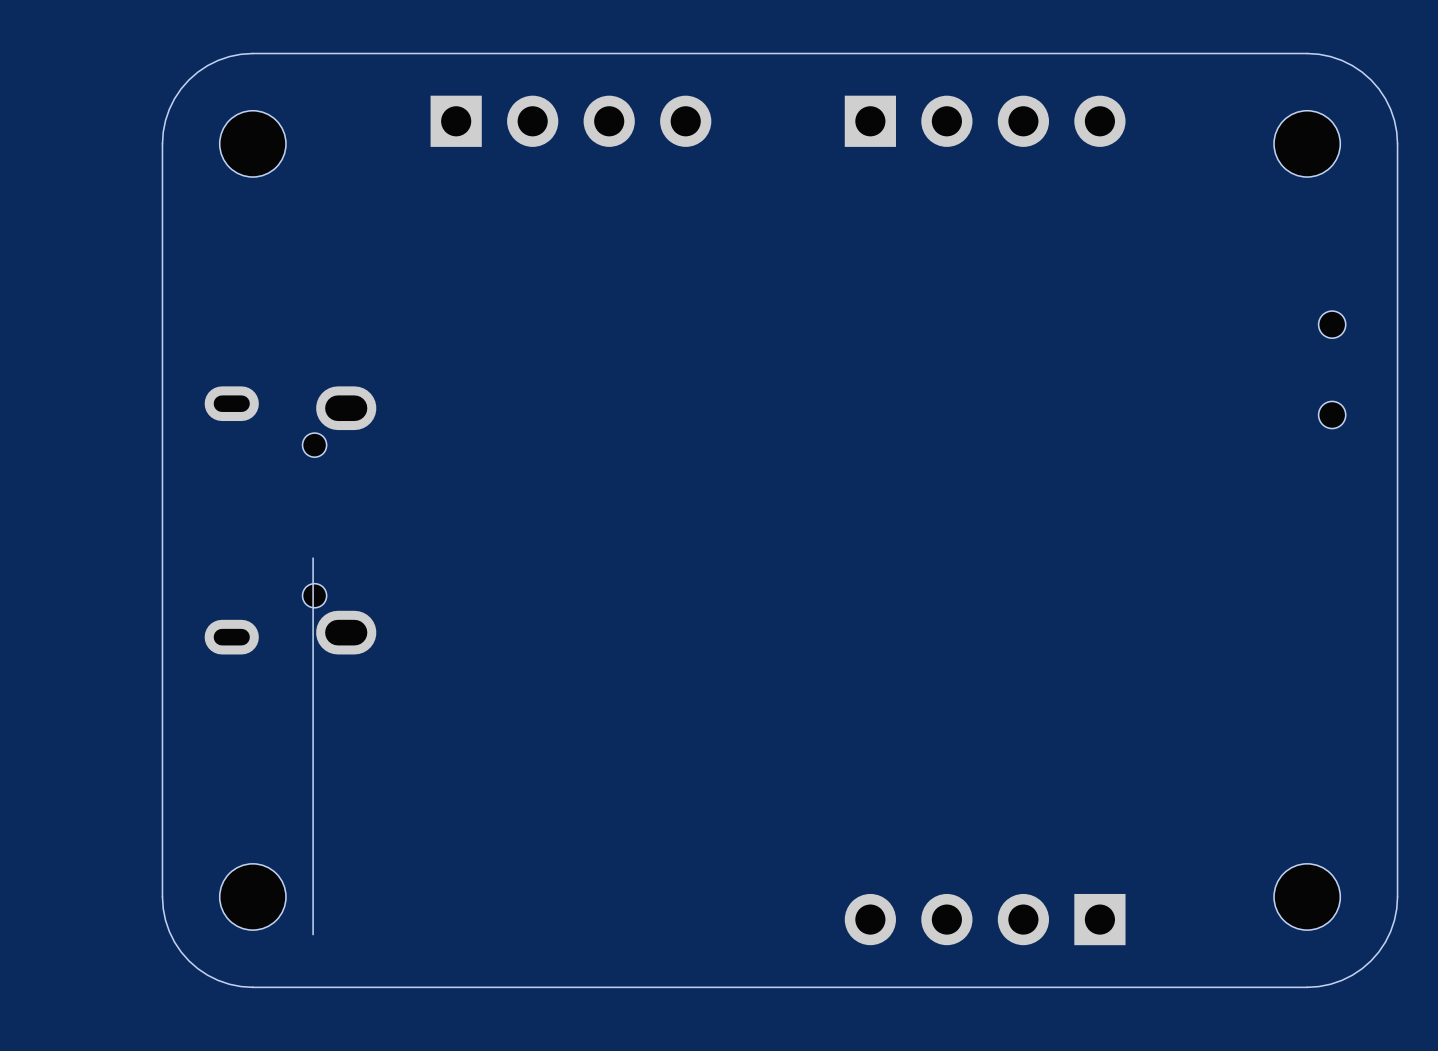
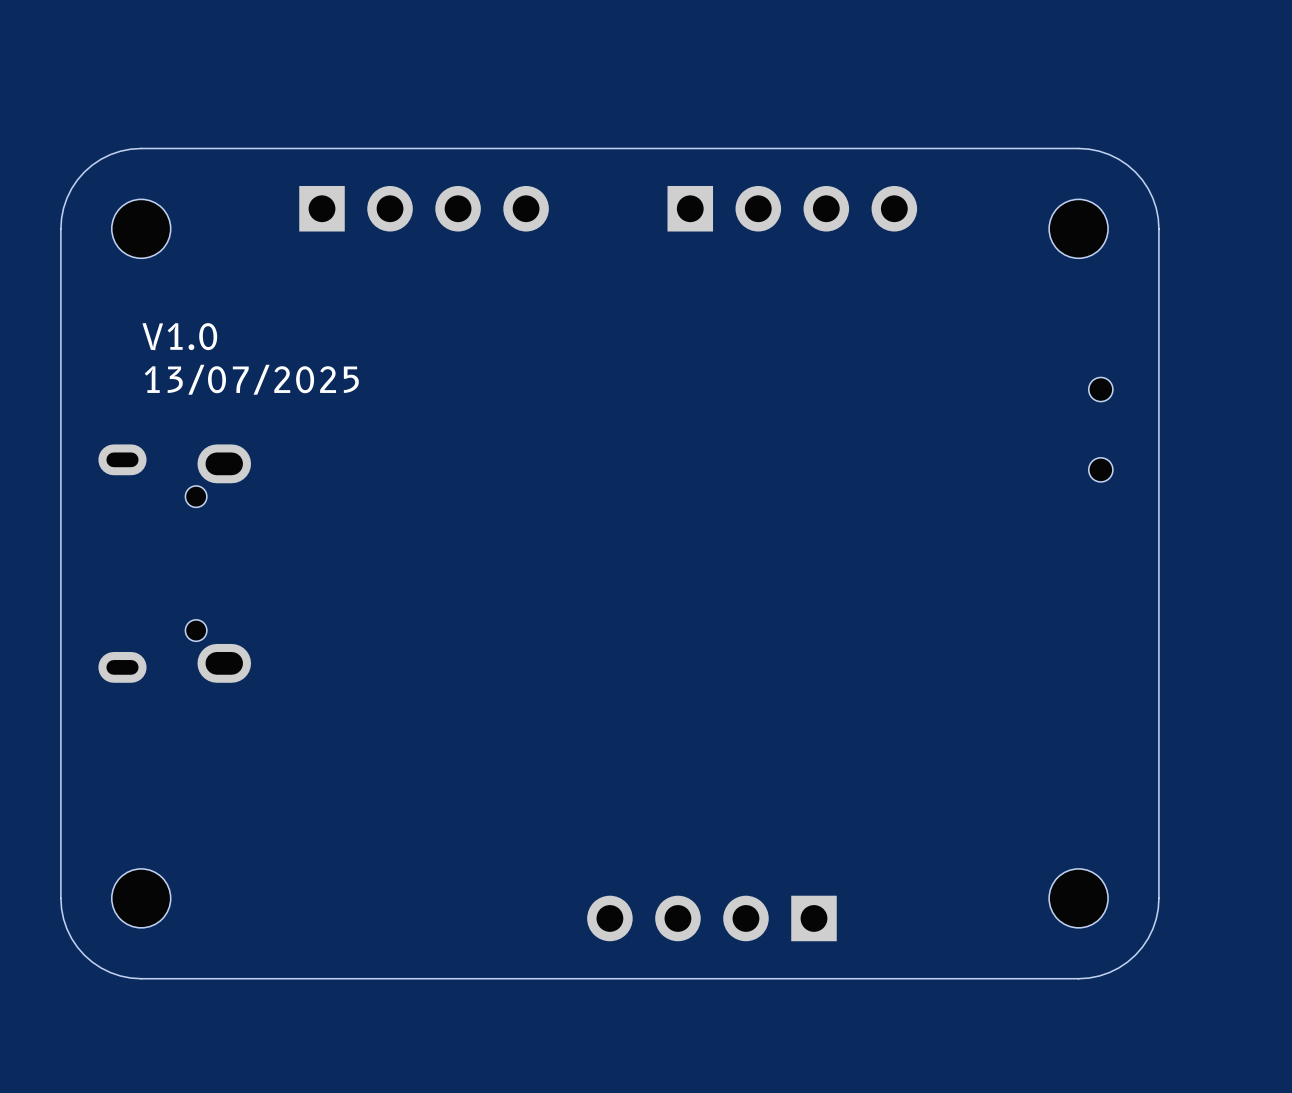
text: none -> V1.0 (179, 336)
text: none -> 13/07/2025 (251, 379)
board edge: (313, 558) (313, 934) -> none
part position: (985, 919) -> (711, 918)

